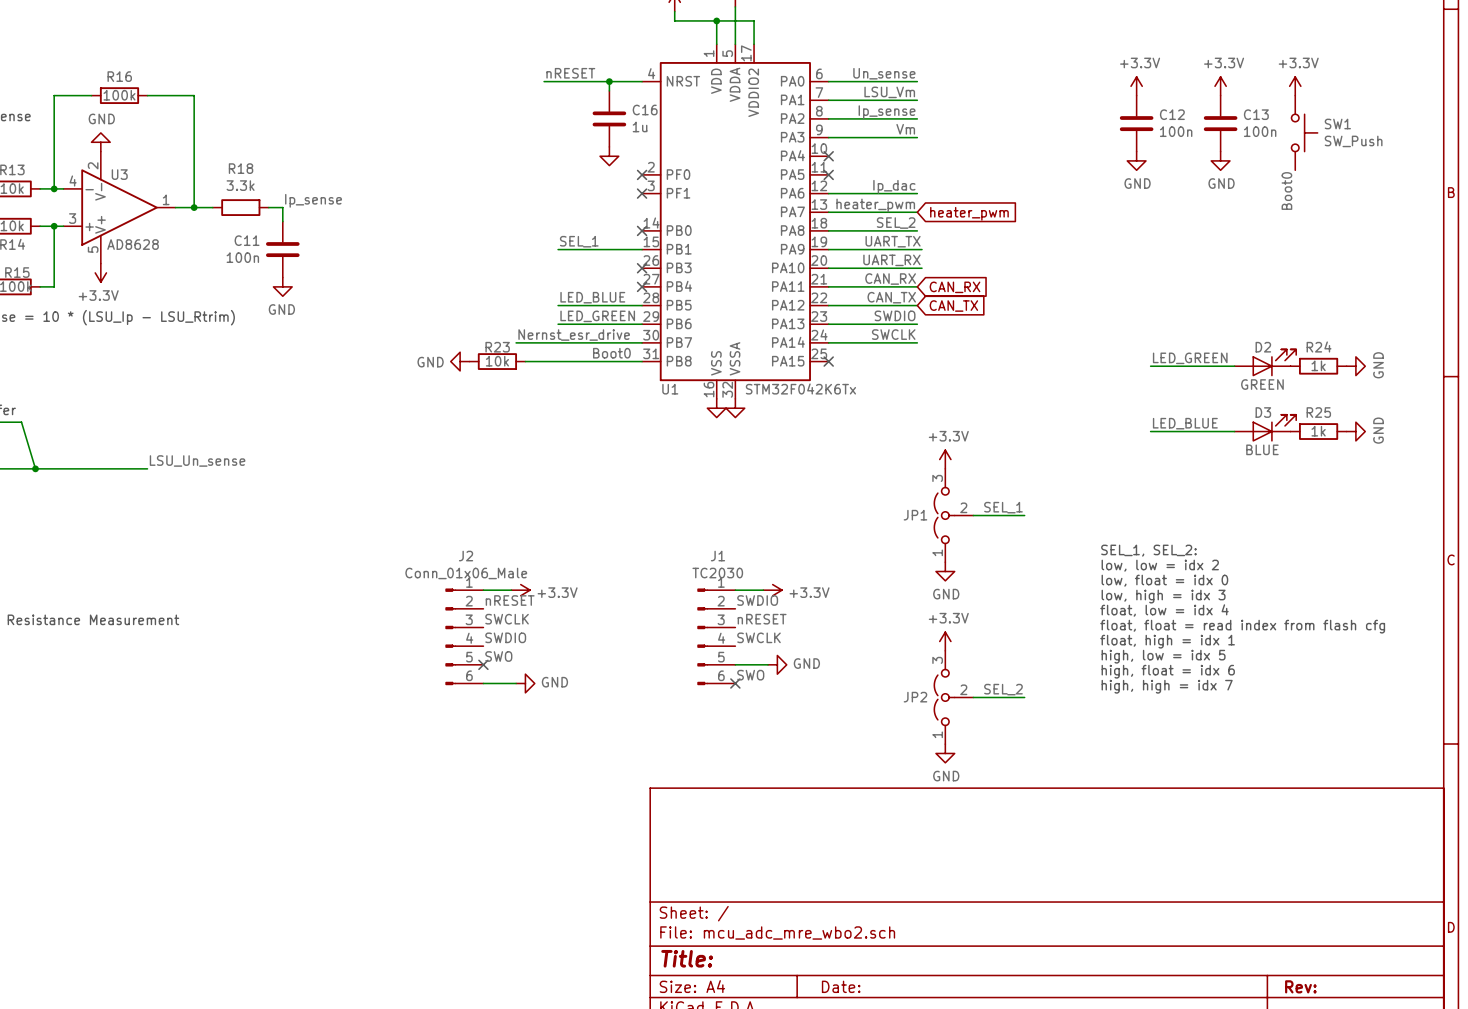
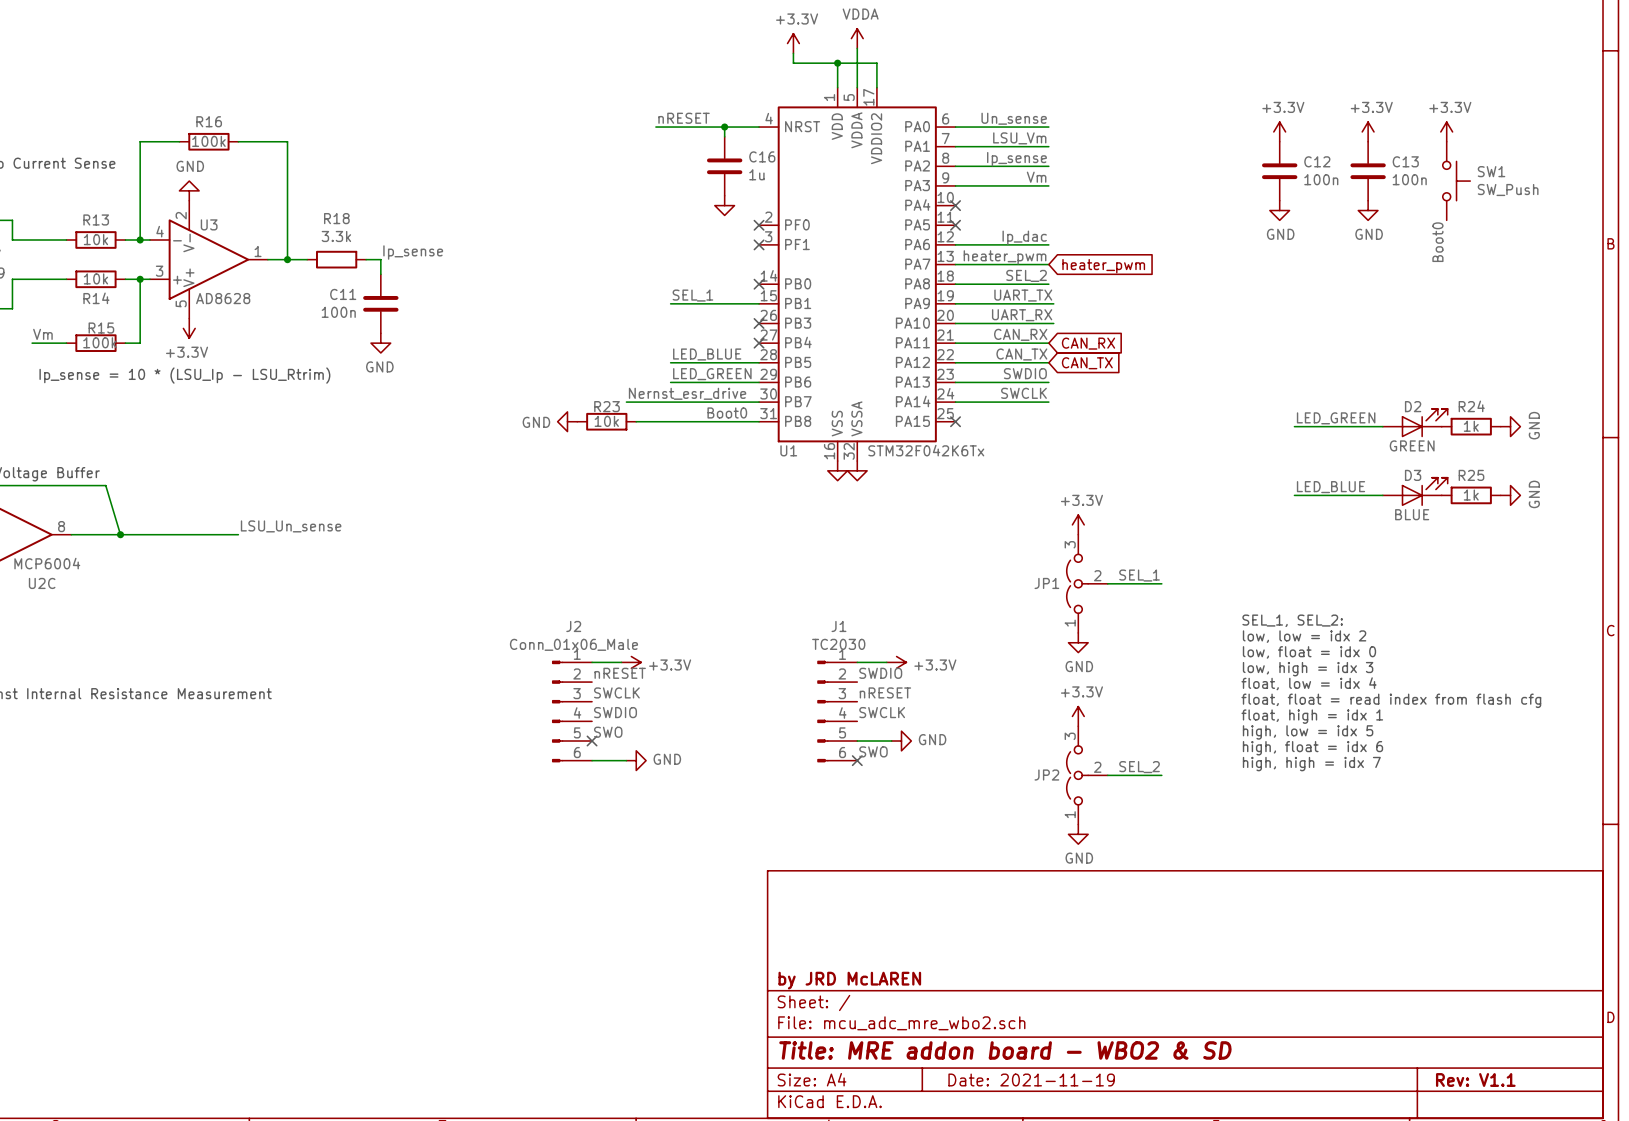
title block: none -> by JRD McLAREN (849, 980)
title block: Title: (687, 958) -> Title: MRE addon board - WBO2 & SD (1005, 1050)
title block: Date: (841, 986) -> Date: 2021-11-19 (1031, 1080)
title block: Rev: (1300, 986) -> Rev: V1.1 (1475, 1080)

